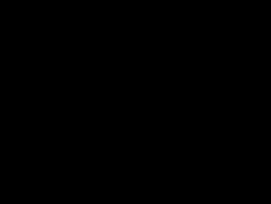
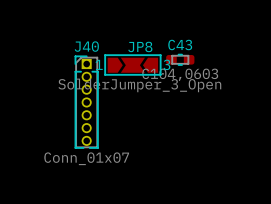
C43: none -> C104,0603 (180, 59)
JP8: none -> SolderJumper_3_Open (132, 64)
J40: none -> Conn_01x07 (86, 102)

